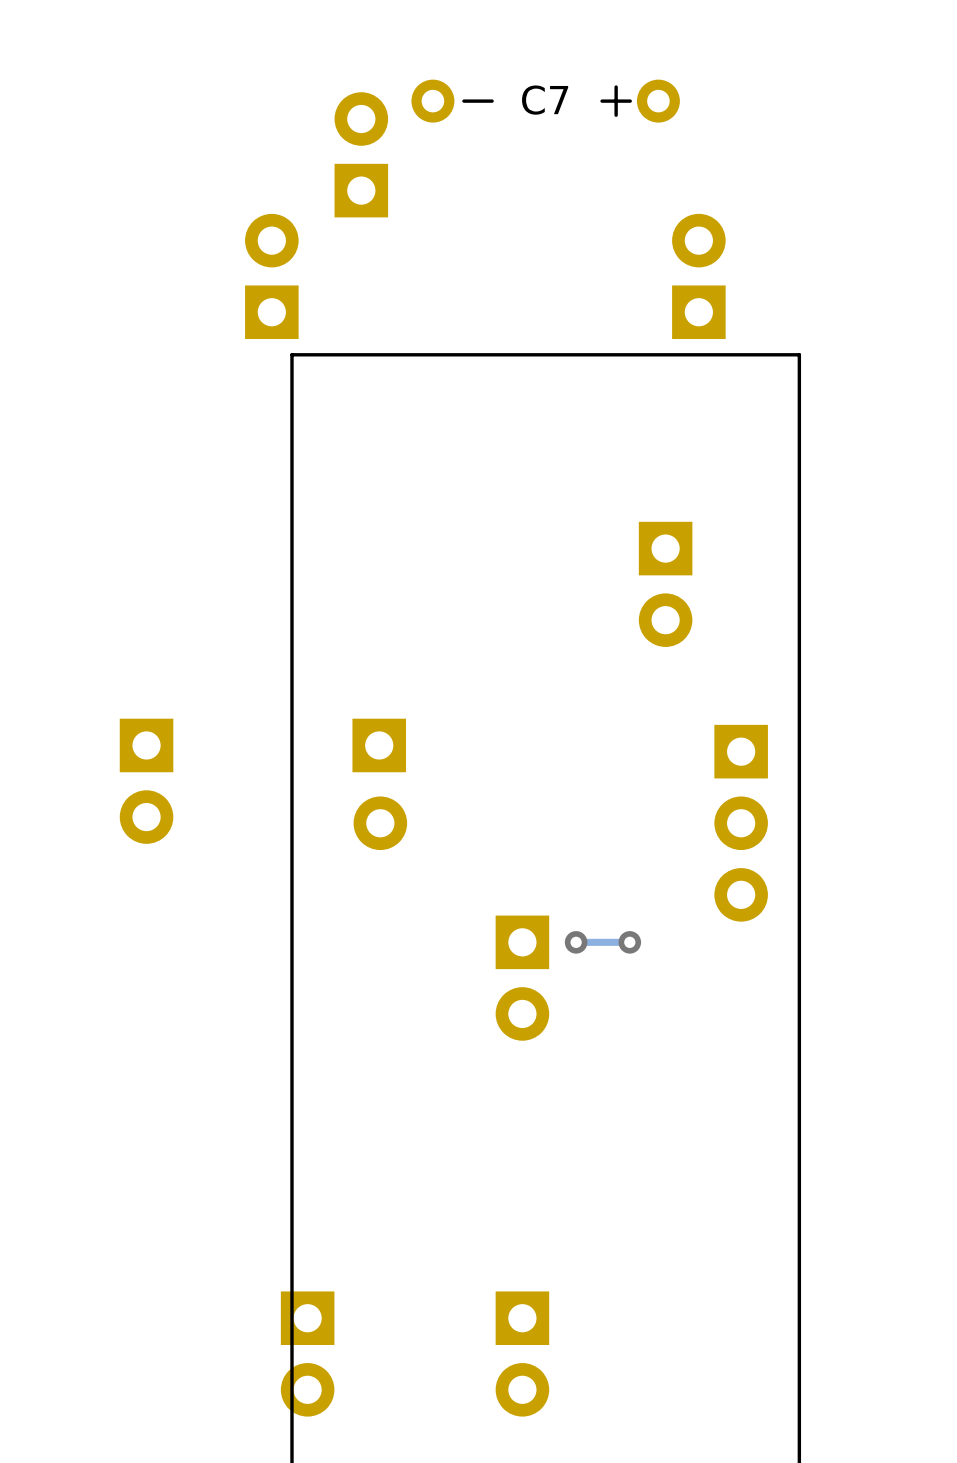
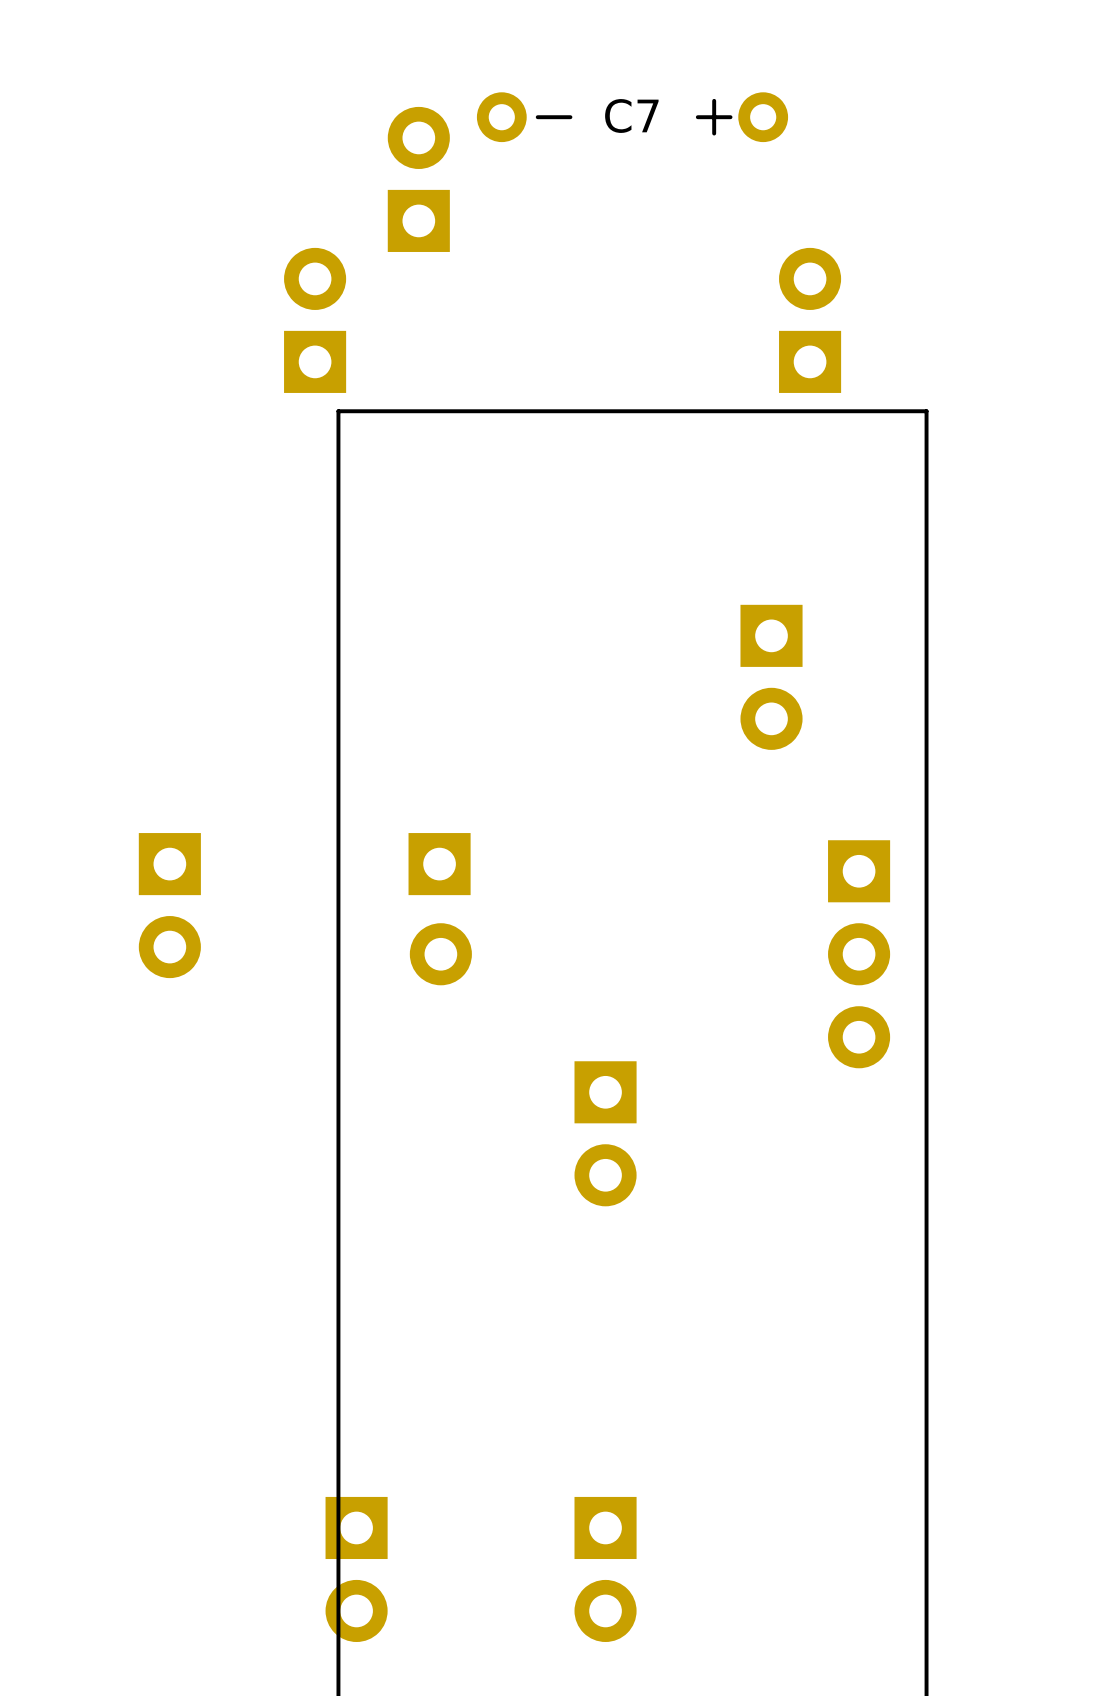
via: (576, 942) -> none
track: (629, 942) (576, 942) -> none
via: (629, 942) -> none

